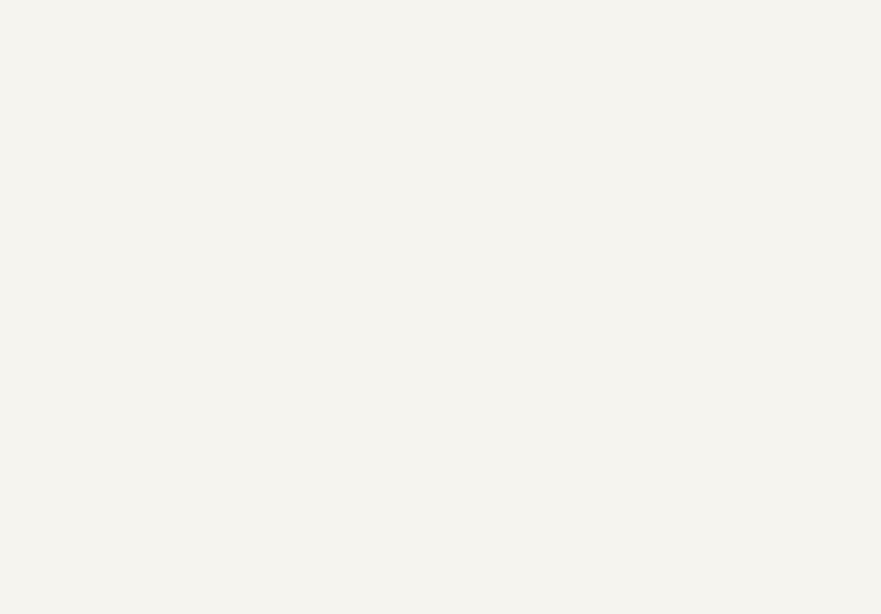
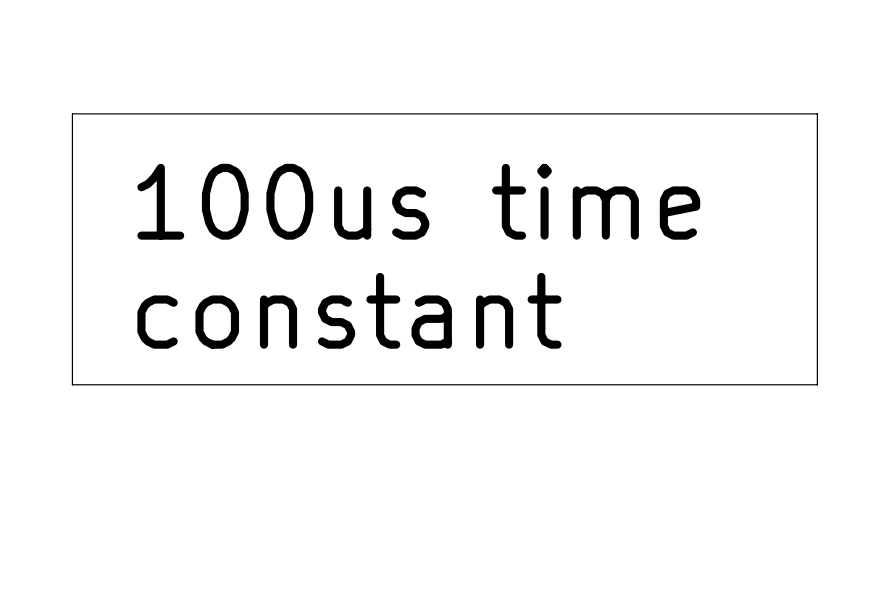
line: none -> (72, 113) (817, 113) (817, 384) (72, 384) (72, 113)
text: none -> 100us time (418, 201)
text: none -> constant (349, 310)

